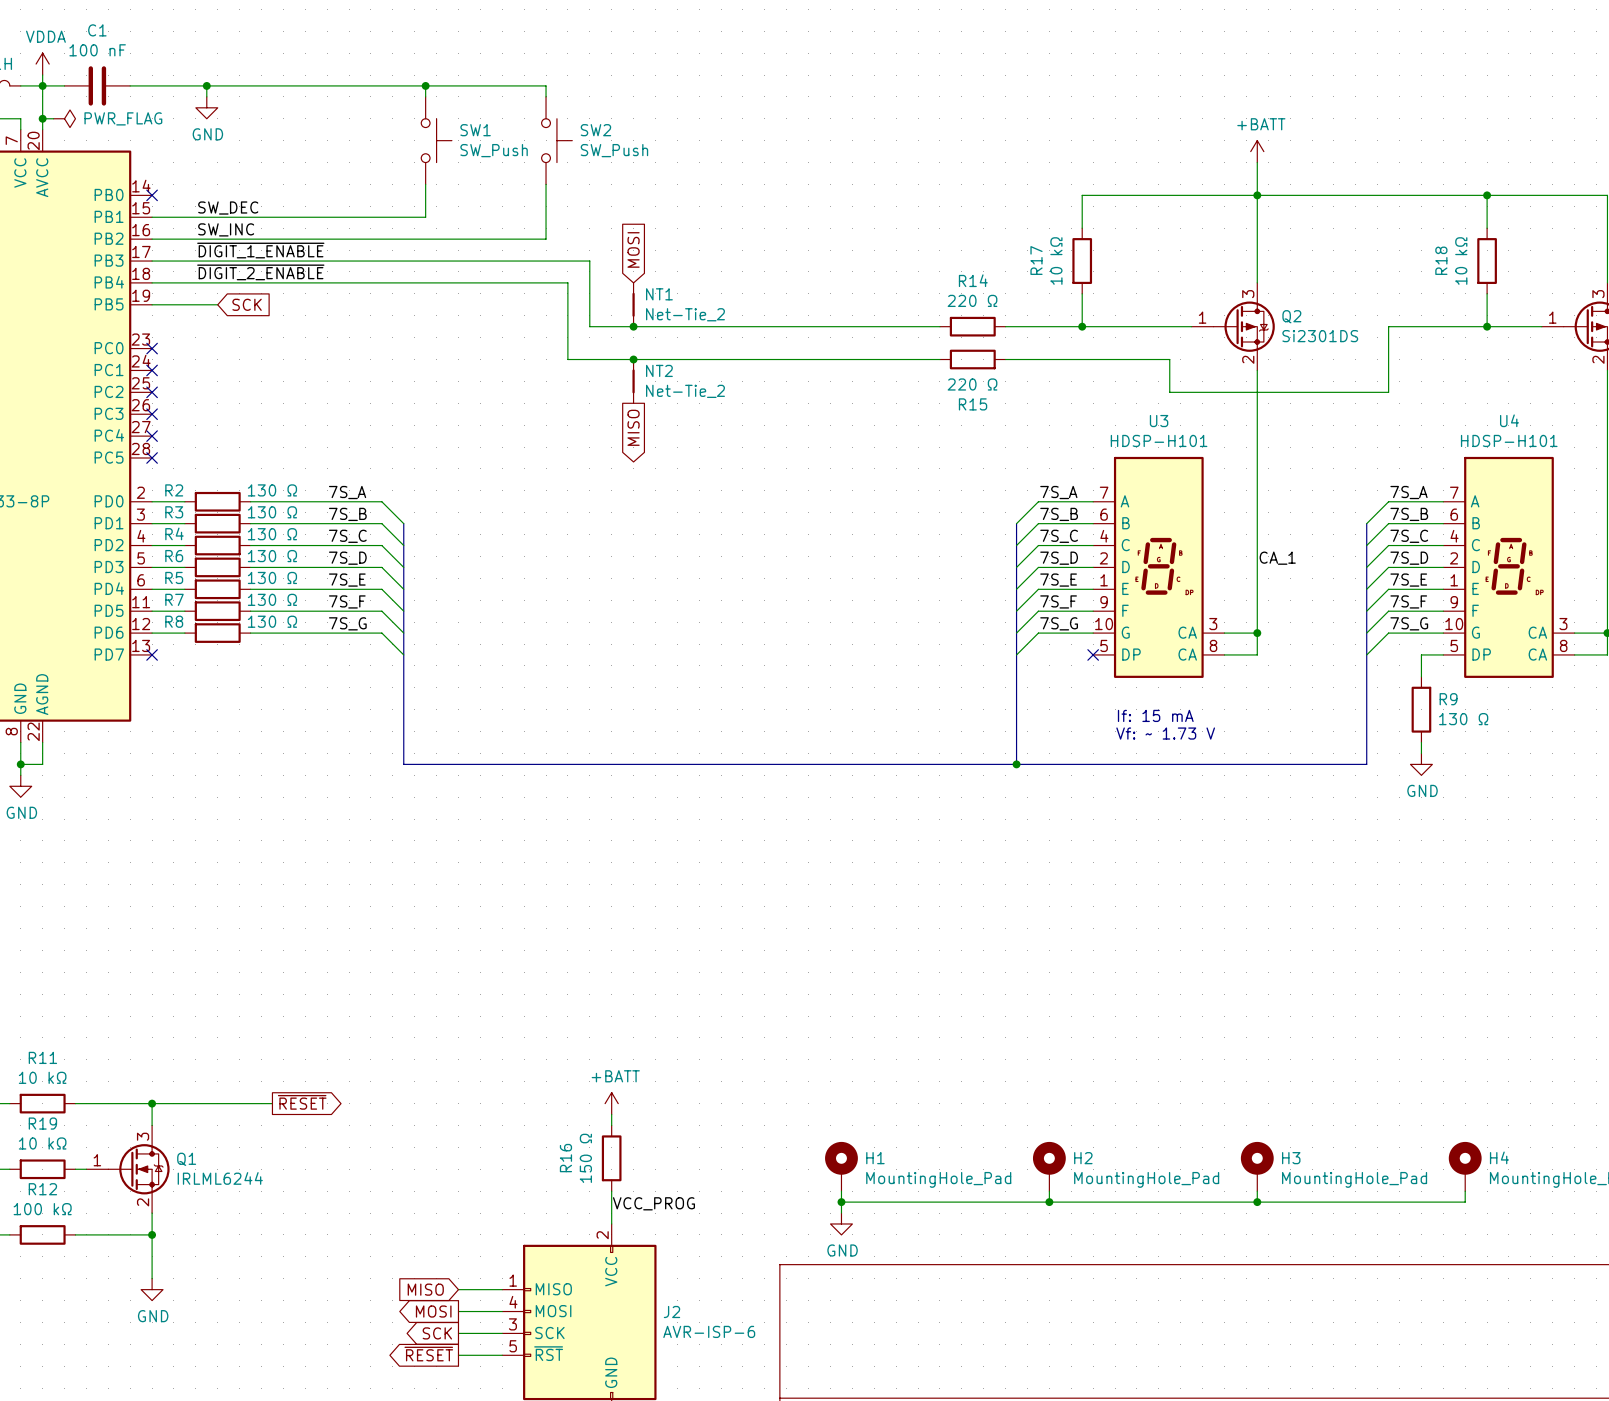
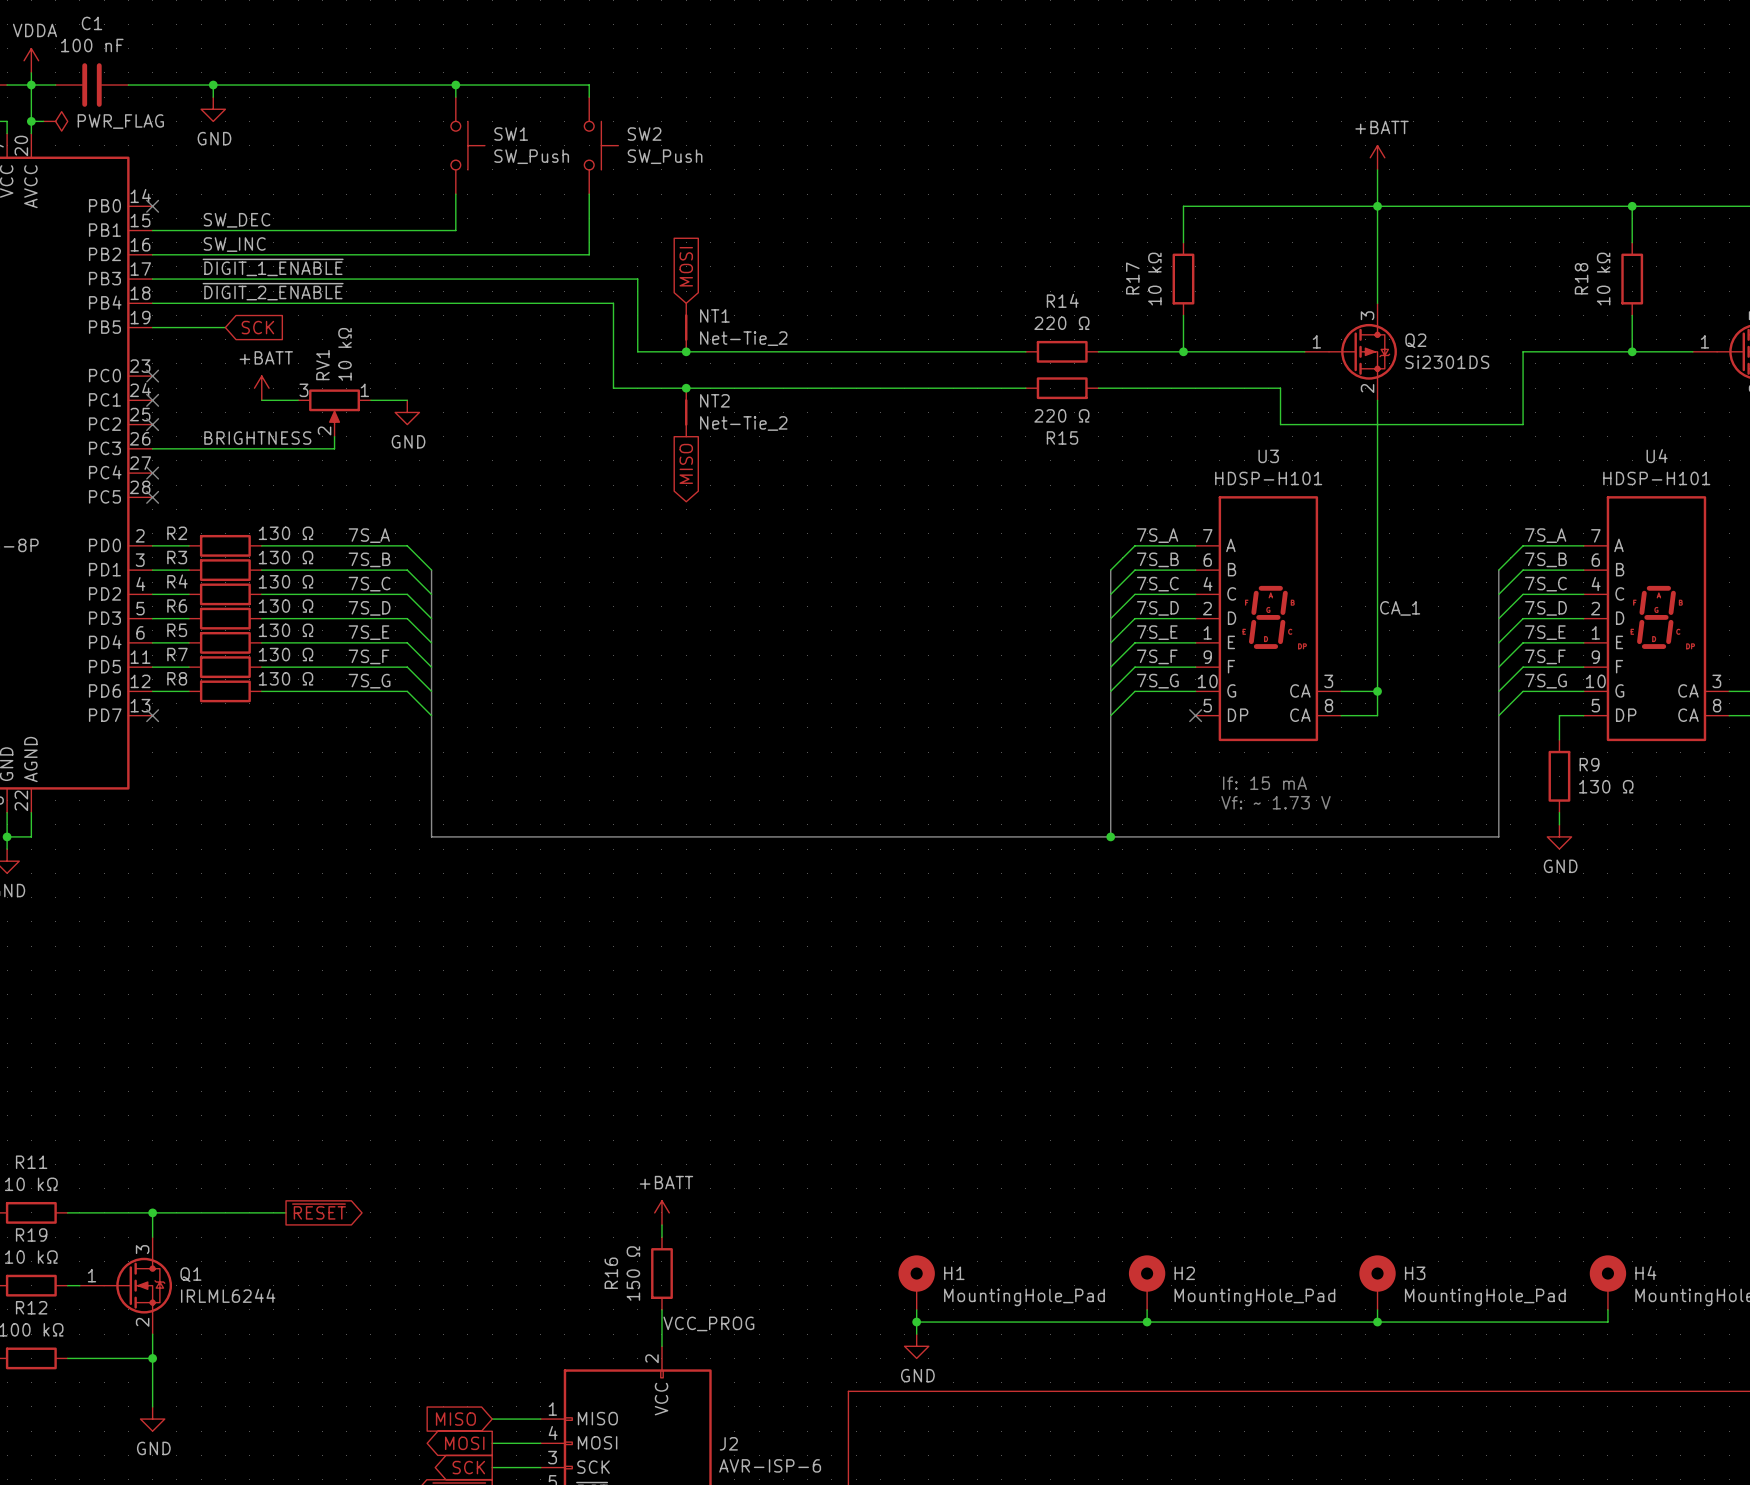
power symbol: none -> +BATT (261, 388)
wire: none -> (261, 400) (298, 400)
wire: none -> (370, 400) (407, 400)
RV1: none -> 10 kΩ (334, 413)
power symbol: none -> GND (407, 412)
wire: none -> (334, 436) (334, 448) (152, 448)
label: none -> BRIGHTNESS (257, 438)
no-connect mark: (152, 414) -> none

